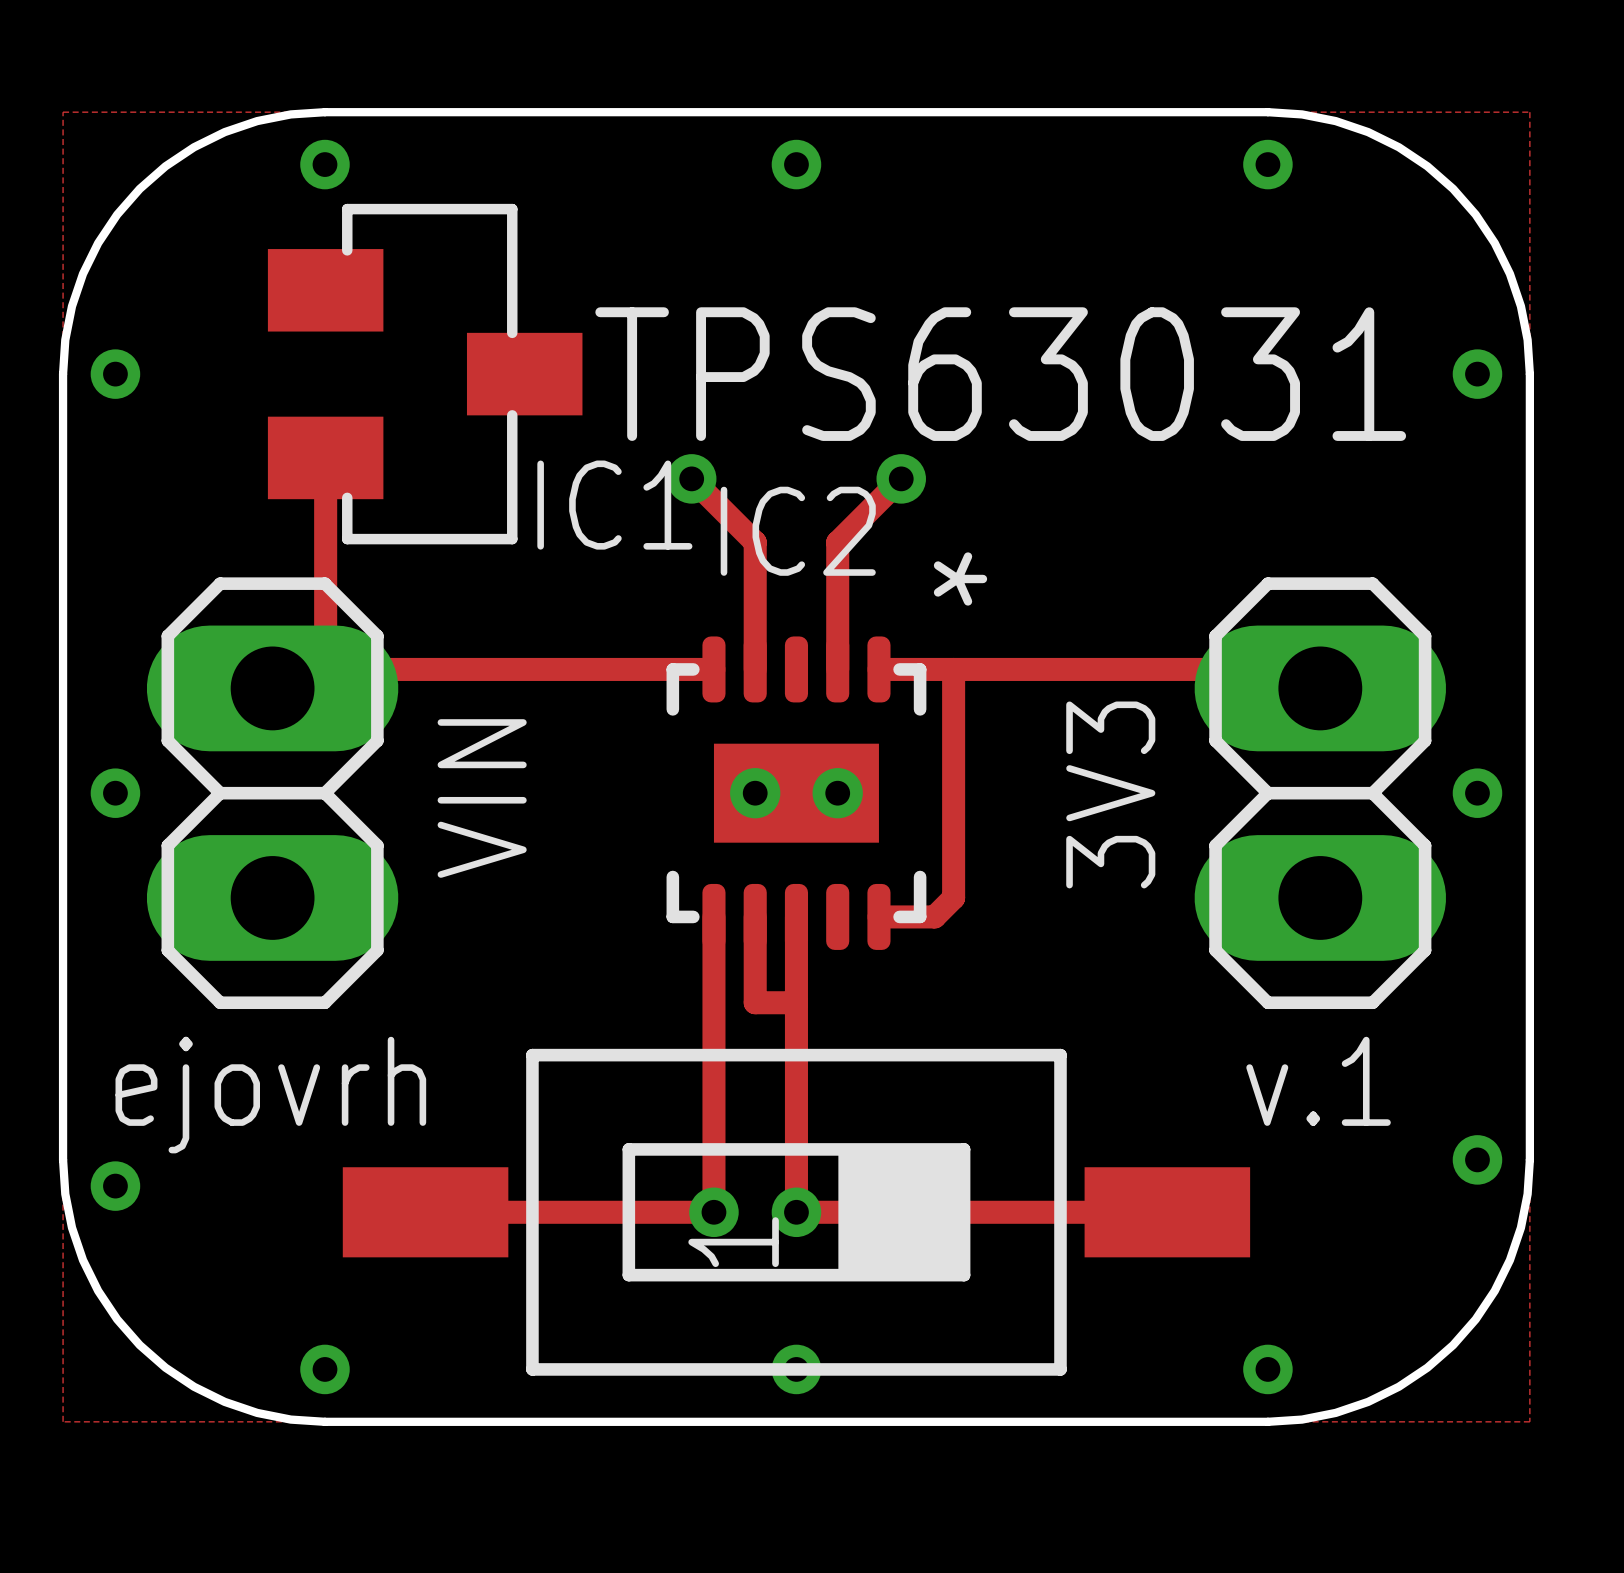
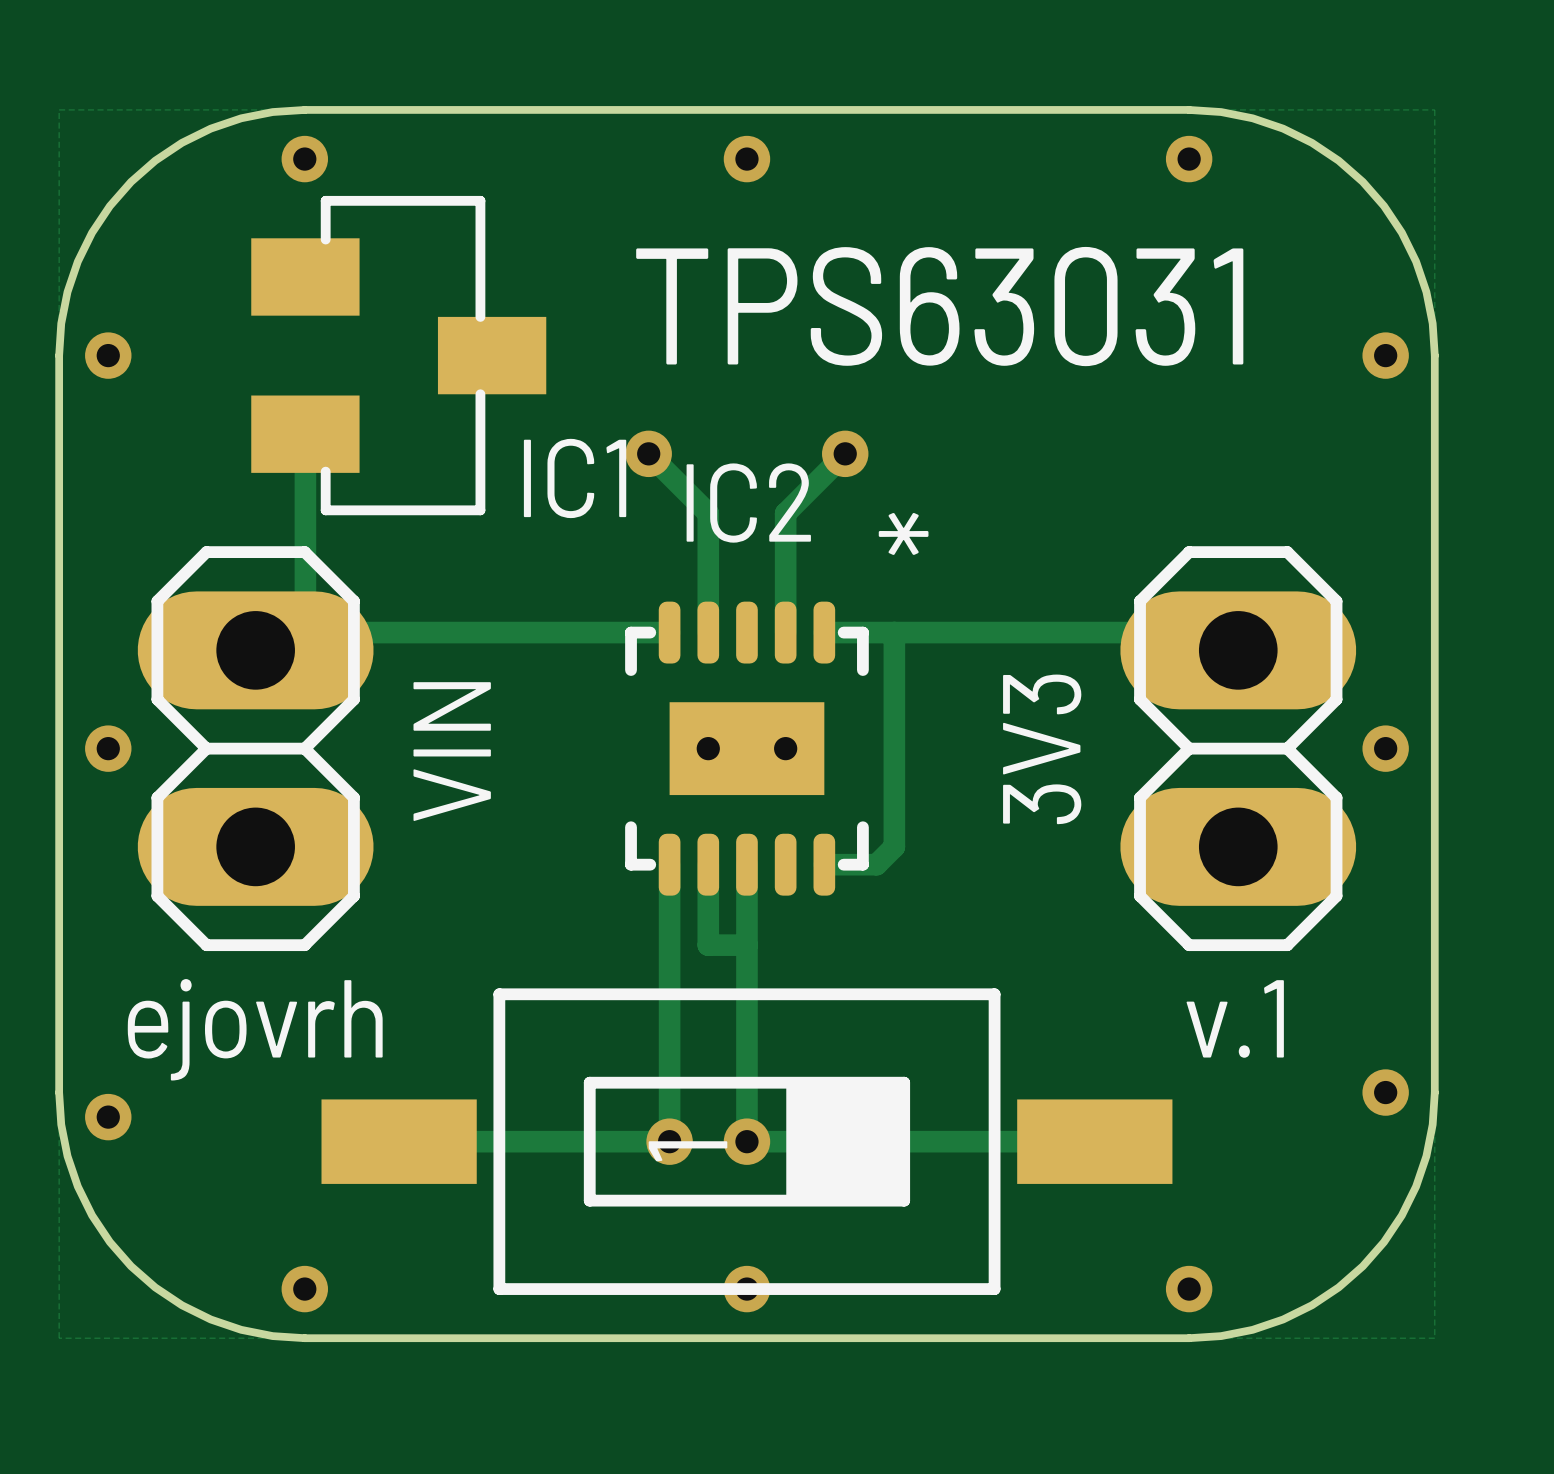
text position: TPS63031 (1000, 374) -> TPS63031 (939, 306)

